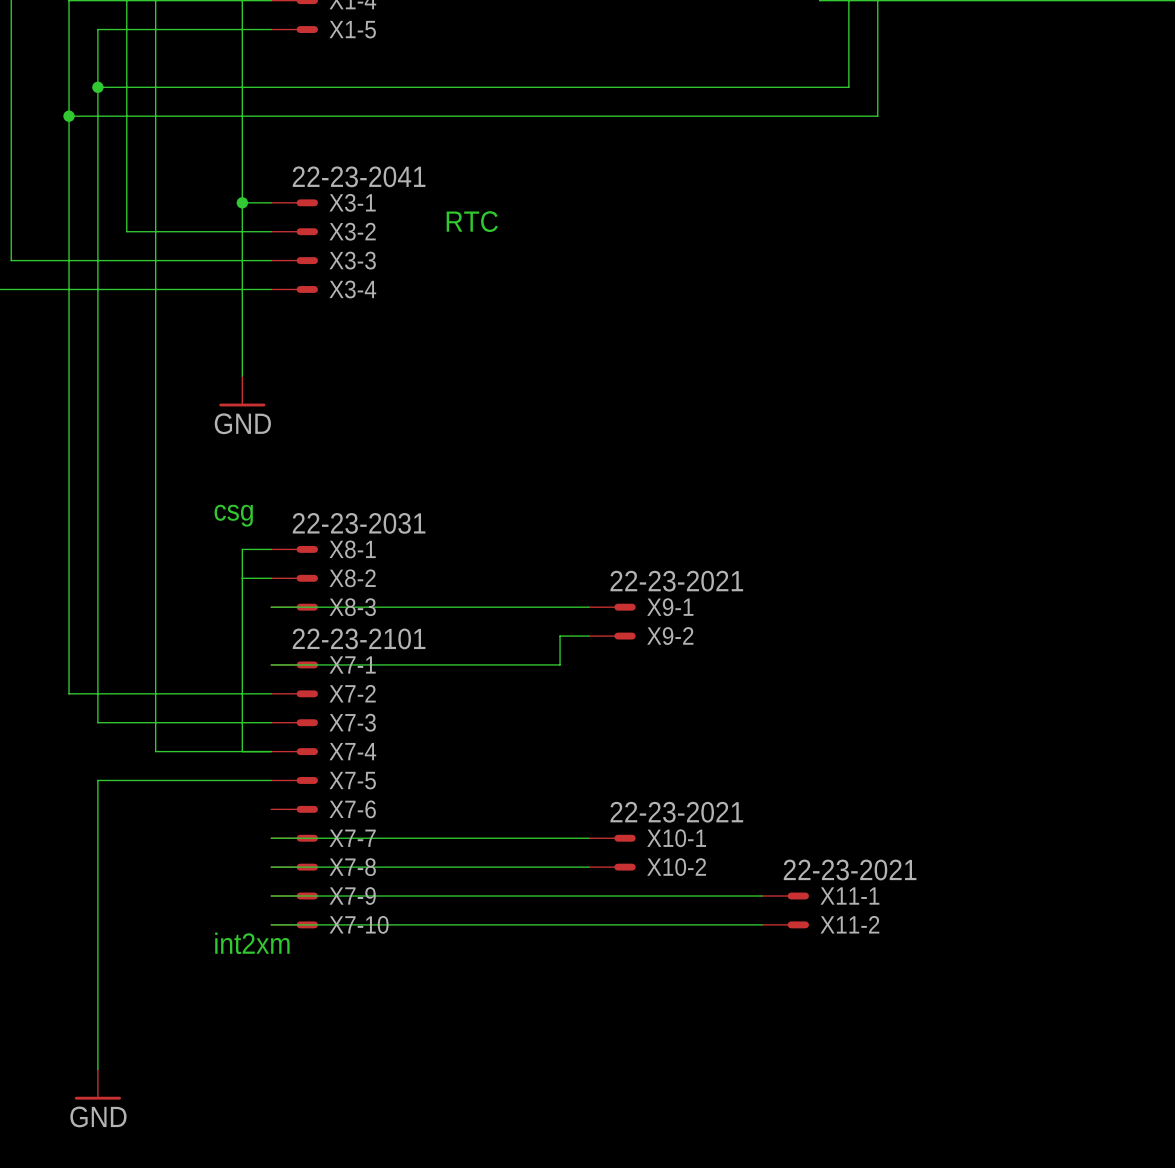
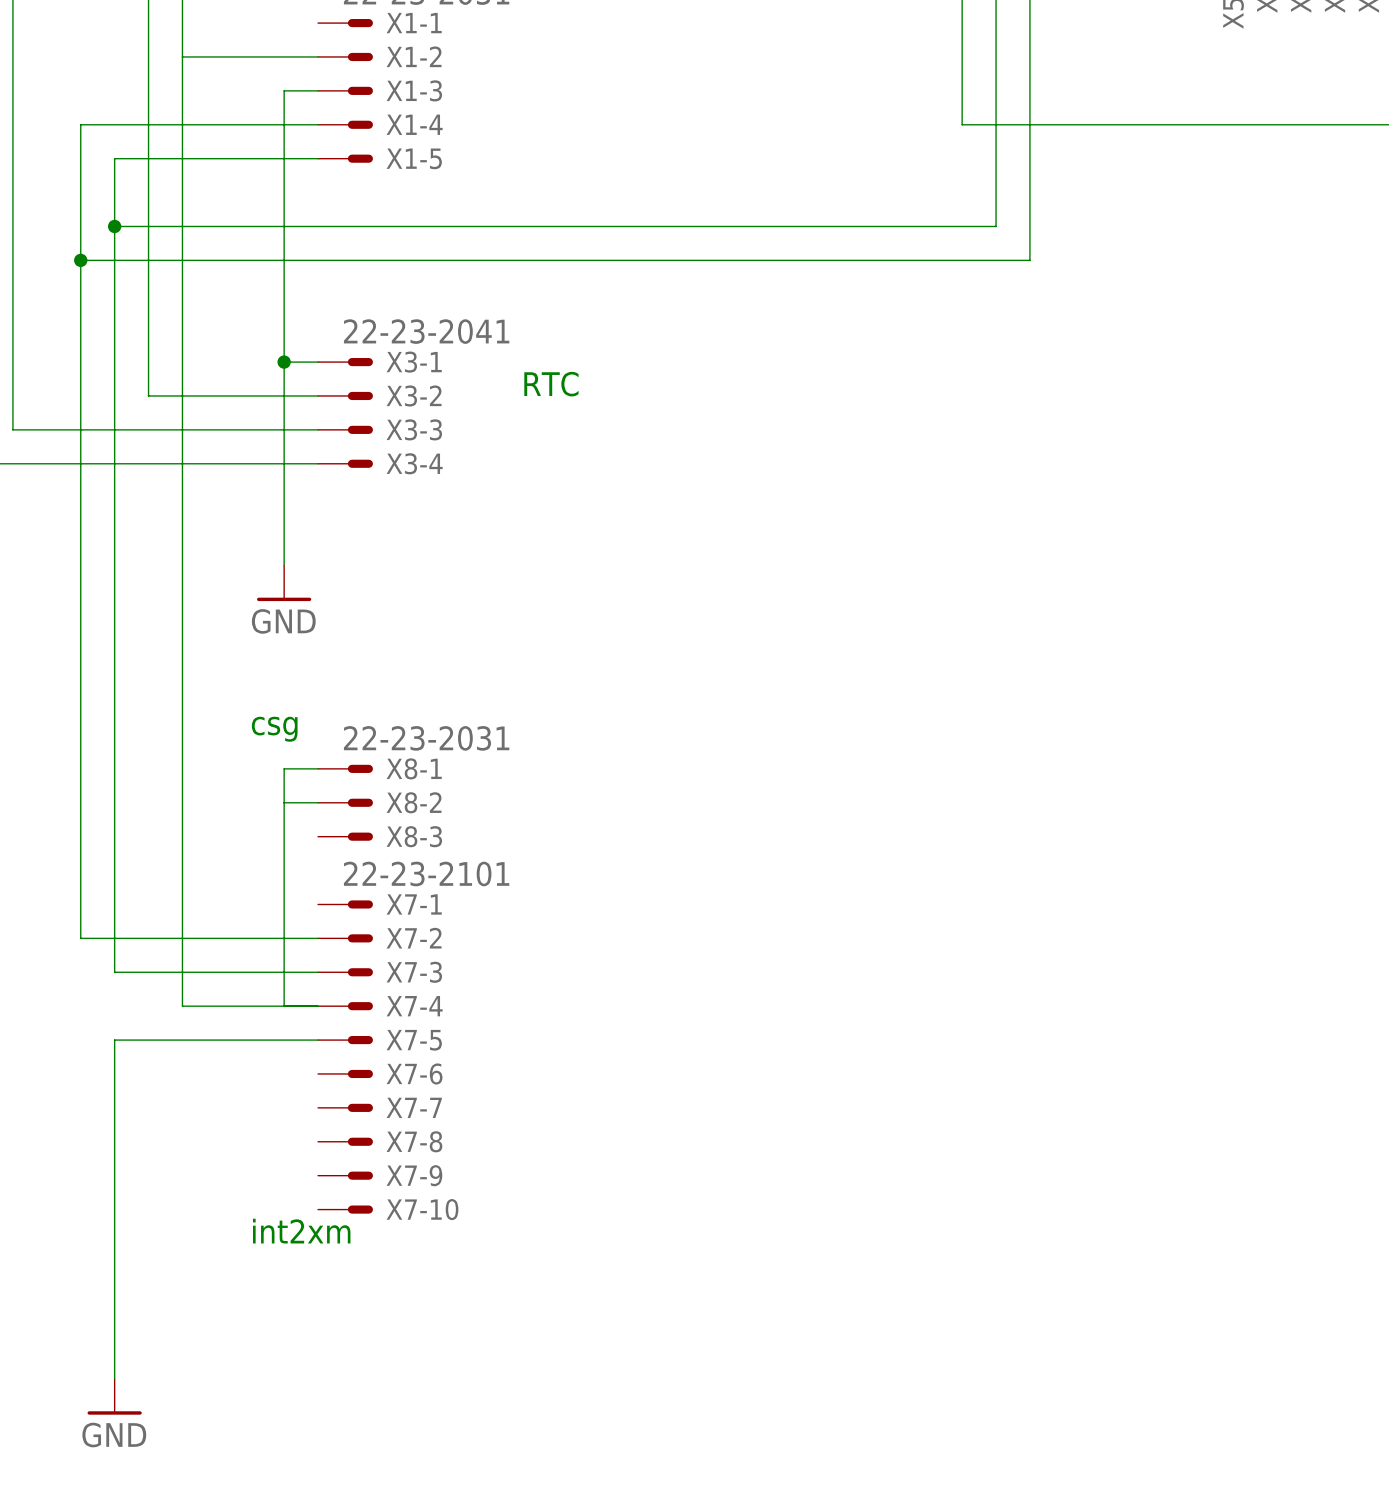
wire: (271, 607) (588, 607) -> none
X9-1: 22-23-2021 (612, 607) -> none
wire: (588, 636) (560, 636) (560, 664) (271, 664) -> none
X9-2: (612, 636) -> none
wire: (271, 838) (588, 838) -> none
X10-1: 22-23-2021 (612, 838) -> none
wire: (271, 867) (588, 867) -> none
X10-2: (612, 867) -> none
wire: (271, 896) (762, 896) -> none
X11-1: 22-23-2021 (785, 896) -> none
wire: (271, 924) (762, 924) -> none
X11-2: (785, 924) -> none

